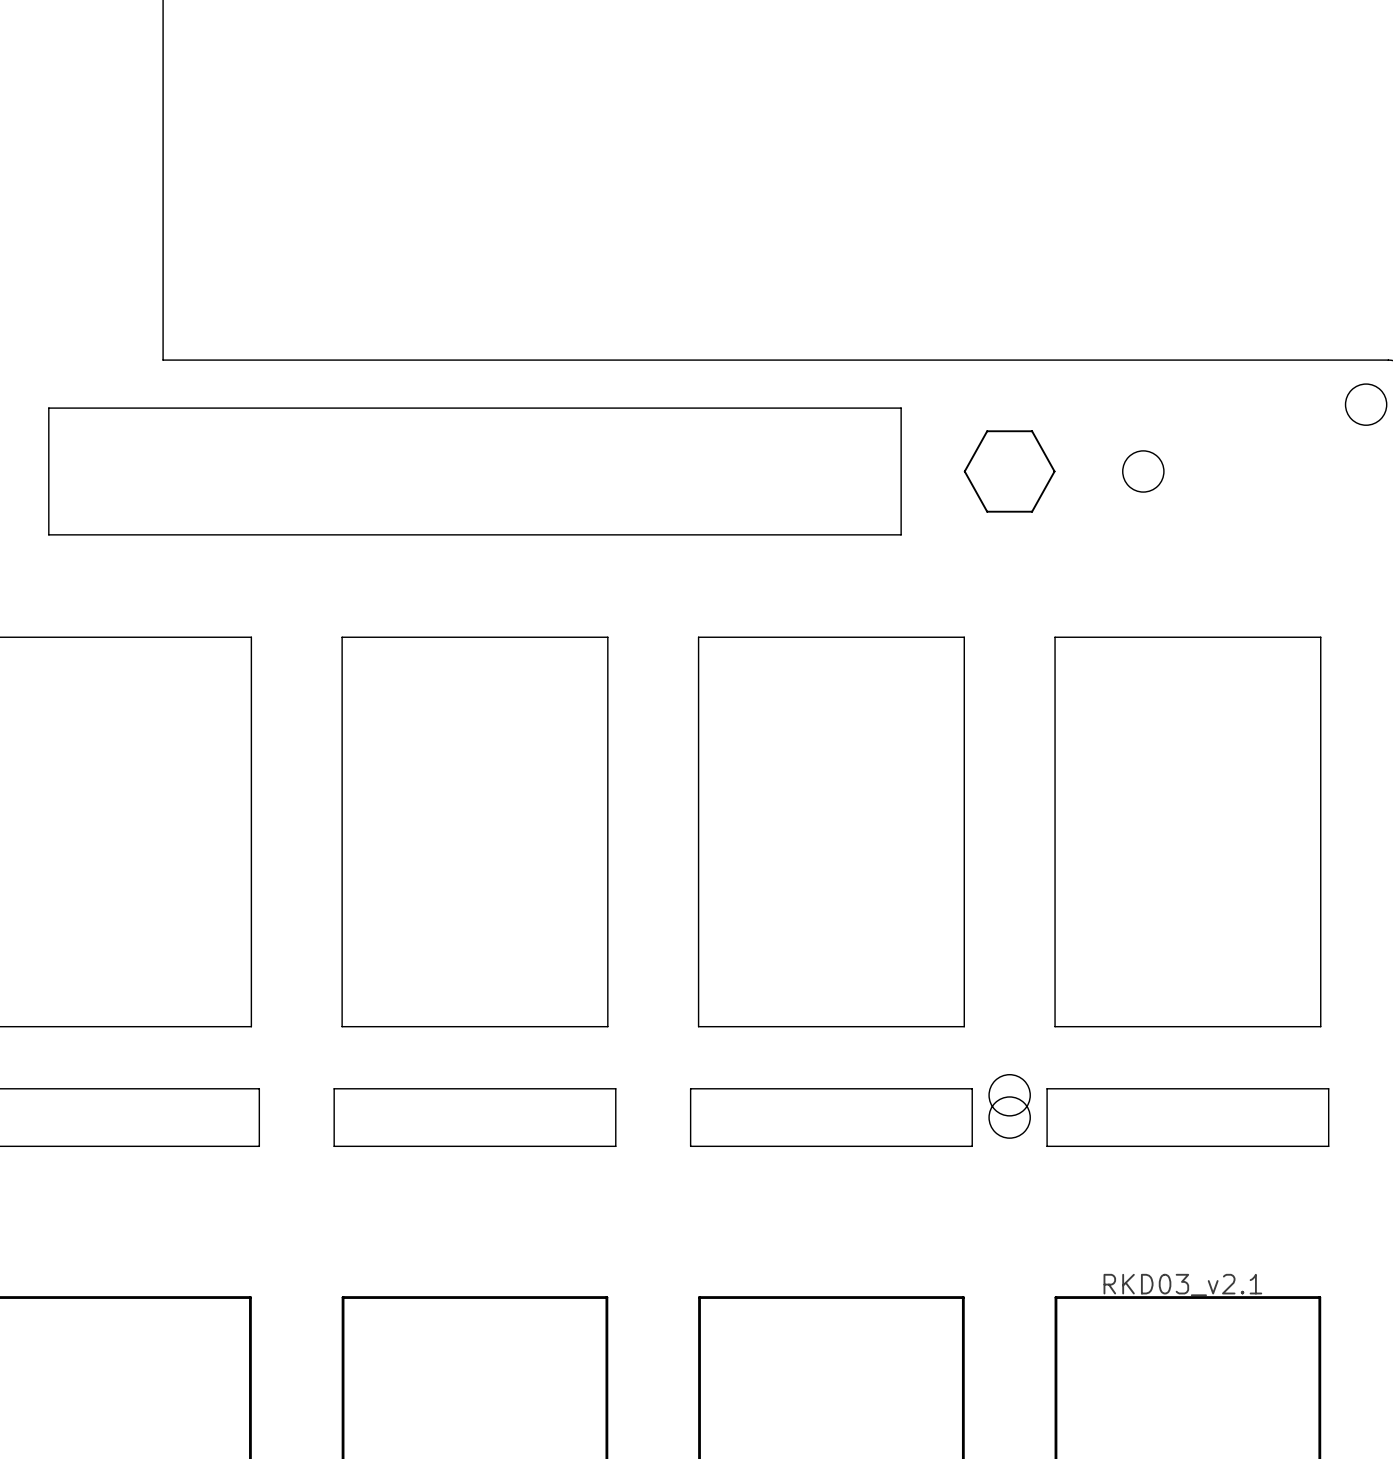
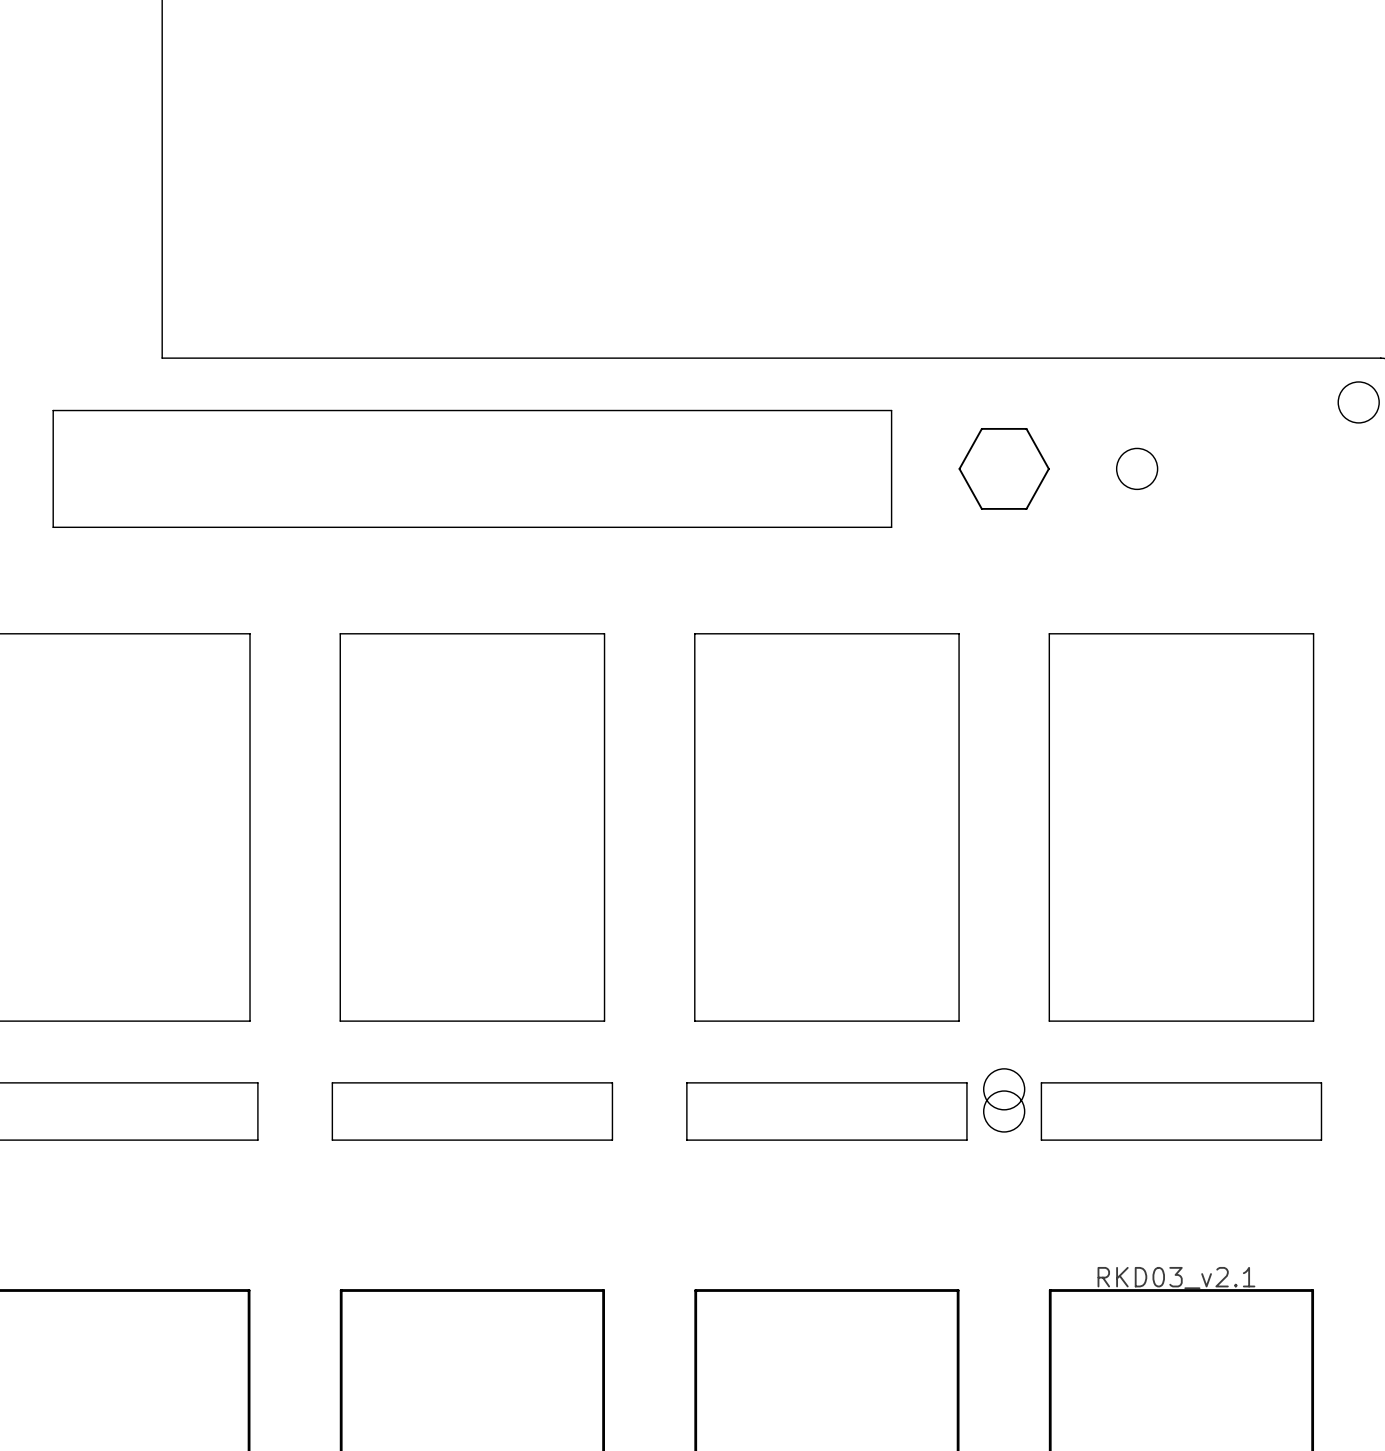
drawing shape: [48, 407, 902, 536] -> [52, 410, 893, 528]

